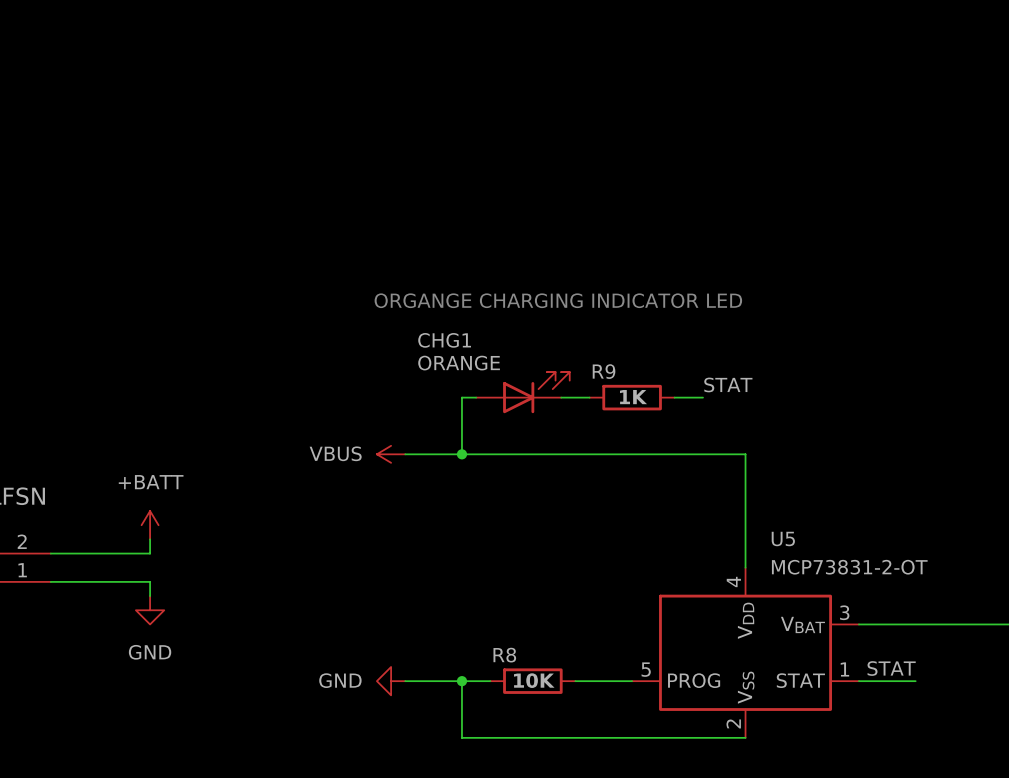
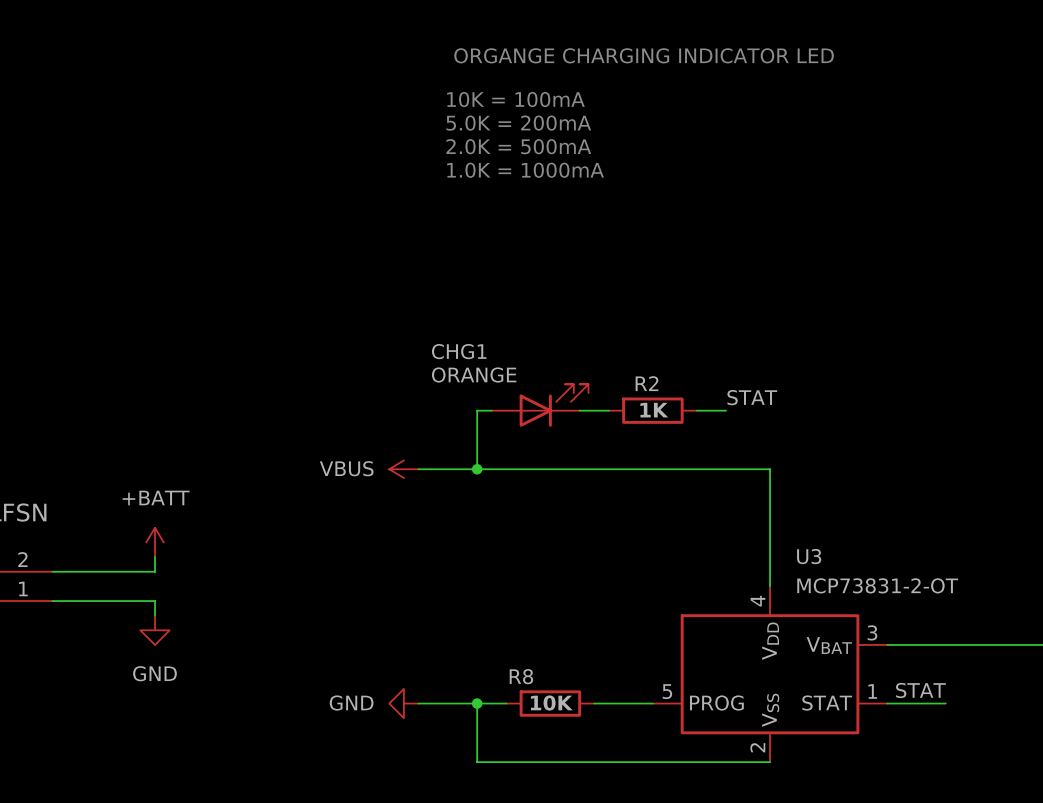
text: none -> 10K = 100mA (515, 99)
text: none -> 5.0K = 200mA (518, 123)
text: none -> 2.0K = 500mA (518, 146)
text: none -> 1.0K = 1000mA (525, 170)
text position: ORGANGE CHARGING INDICATOR LED (558, 300) -> ORGANGE CHARGING INDICATOR LED (644, 55)
R9 name: R9 (604, 371) -> R2 (647, 383)
U5 name: U5 (783, 538) -> U3 (809, 556)

